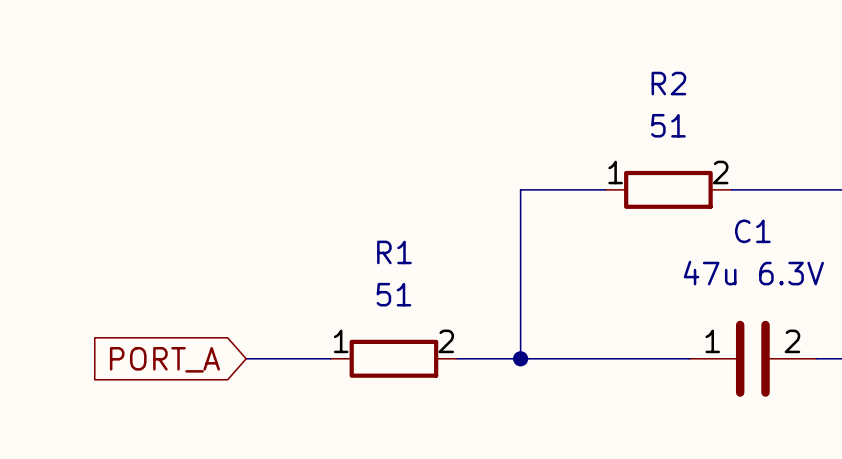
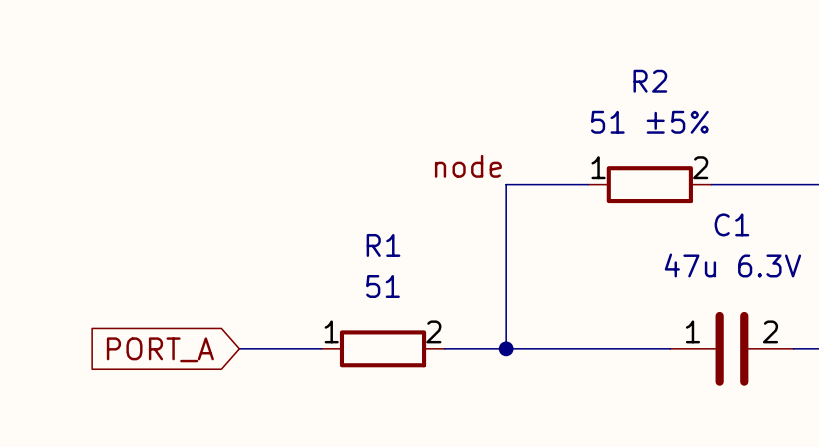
R2 value: 51 (668, 125) -> 51 ±5% (649, 122)
label: none -> node (468, 166)

